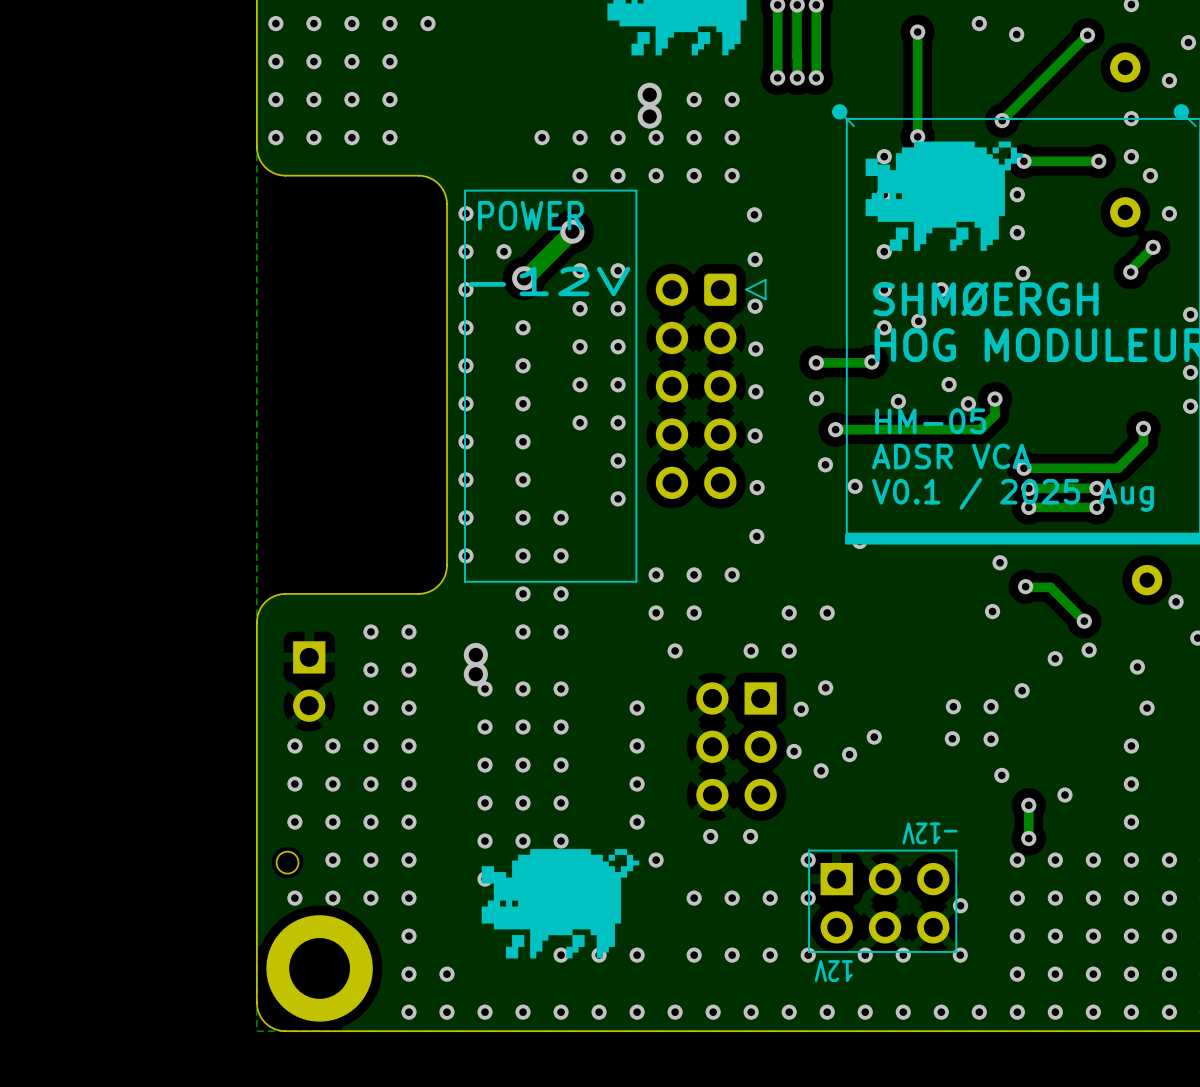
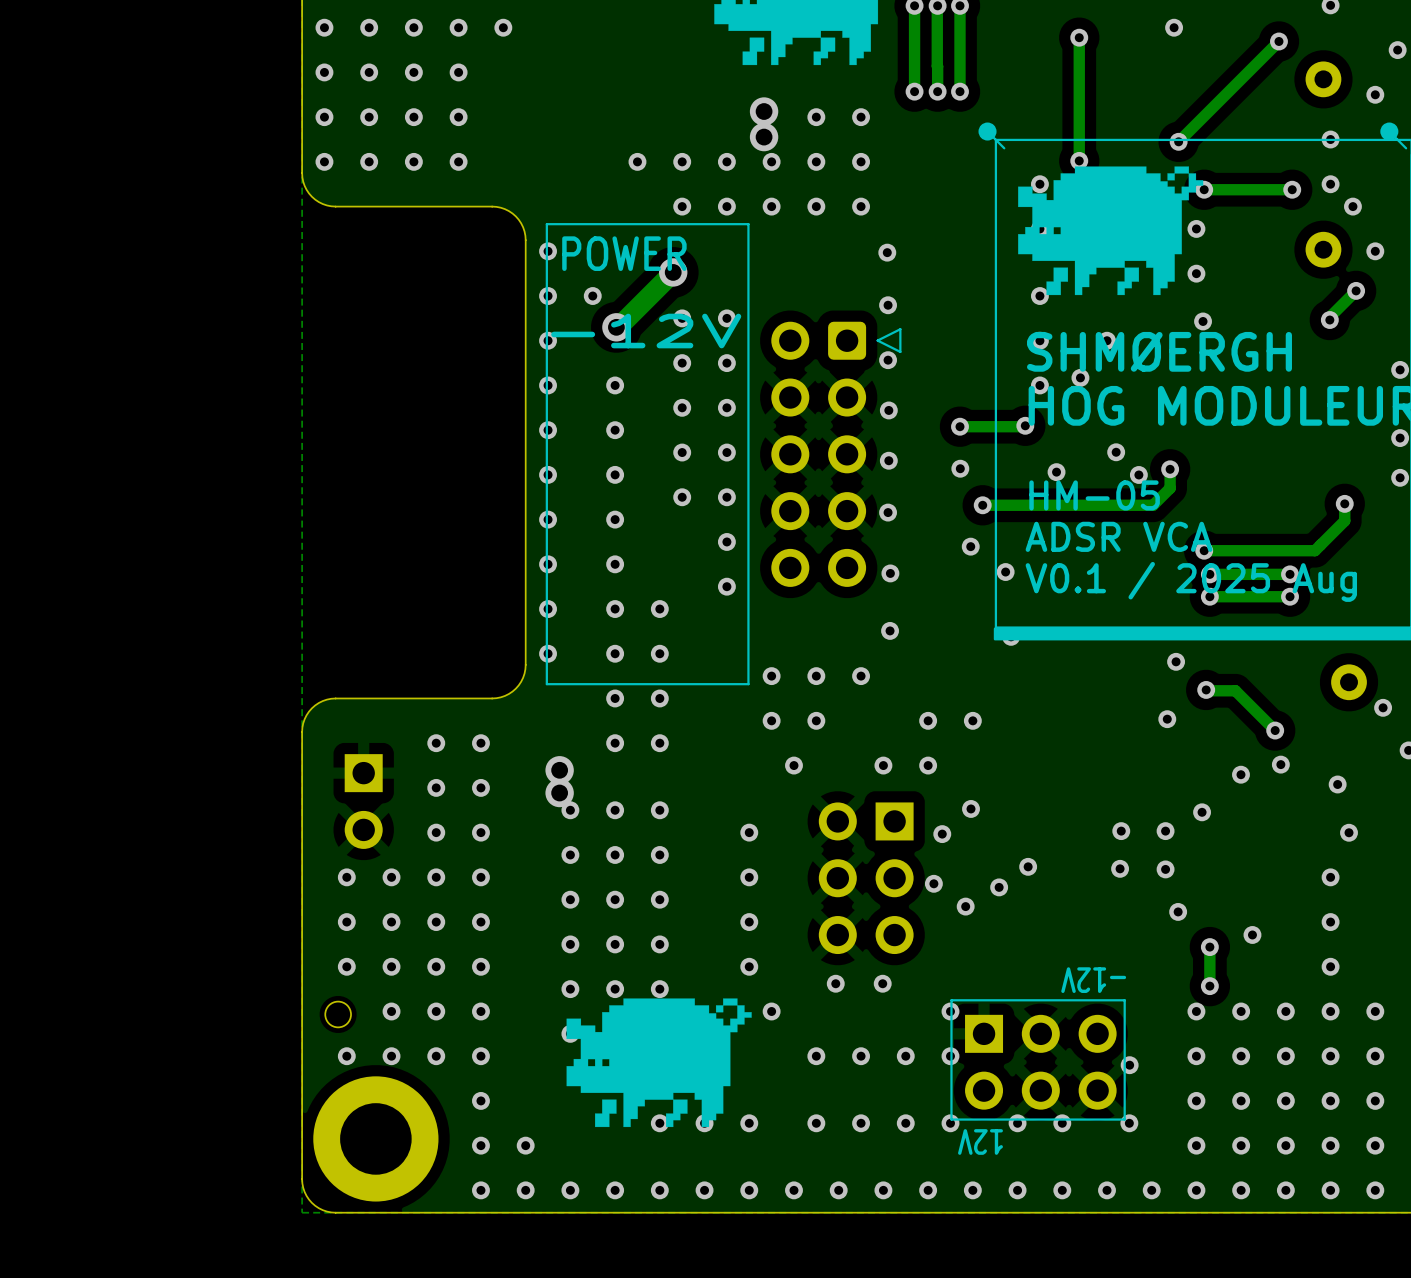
via: (979, 23) -> none
via: none -> (1174, 27)
via: (1016, 34) -> none

